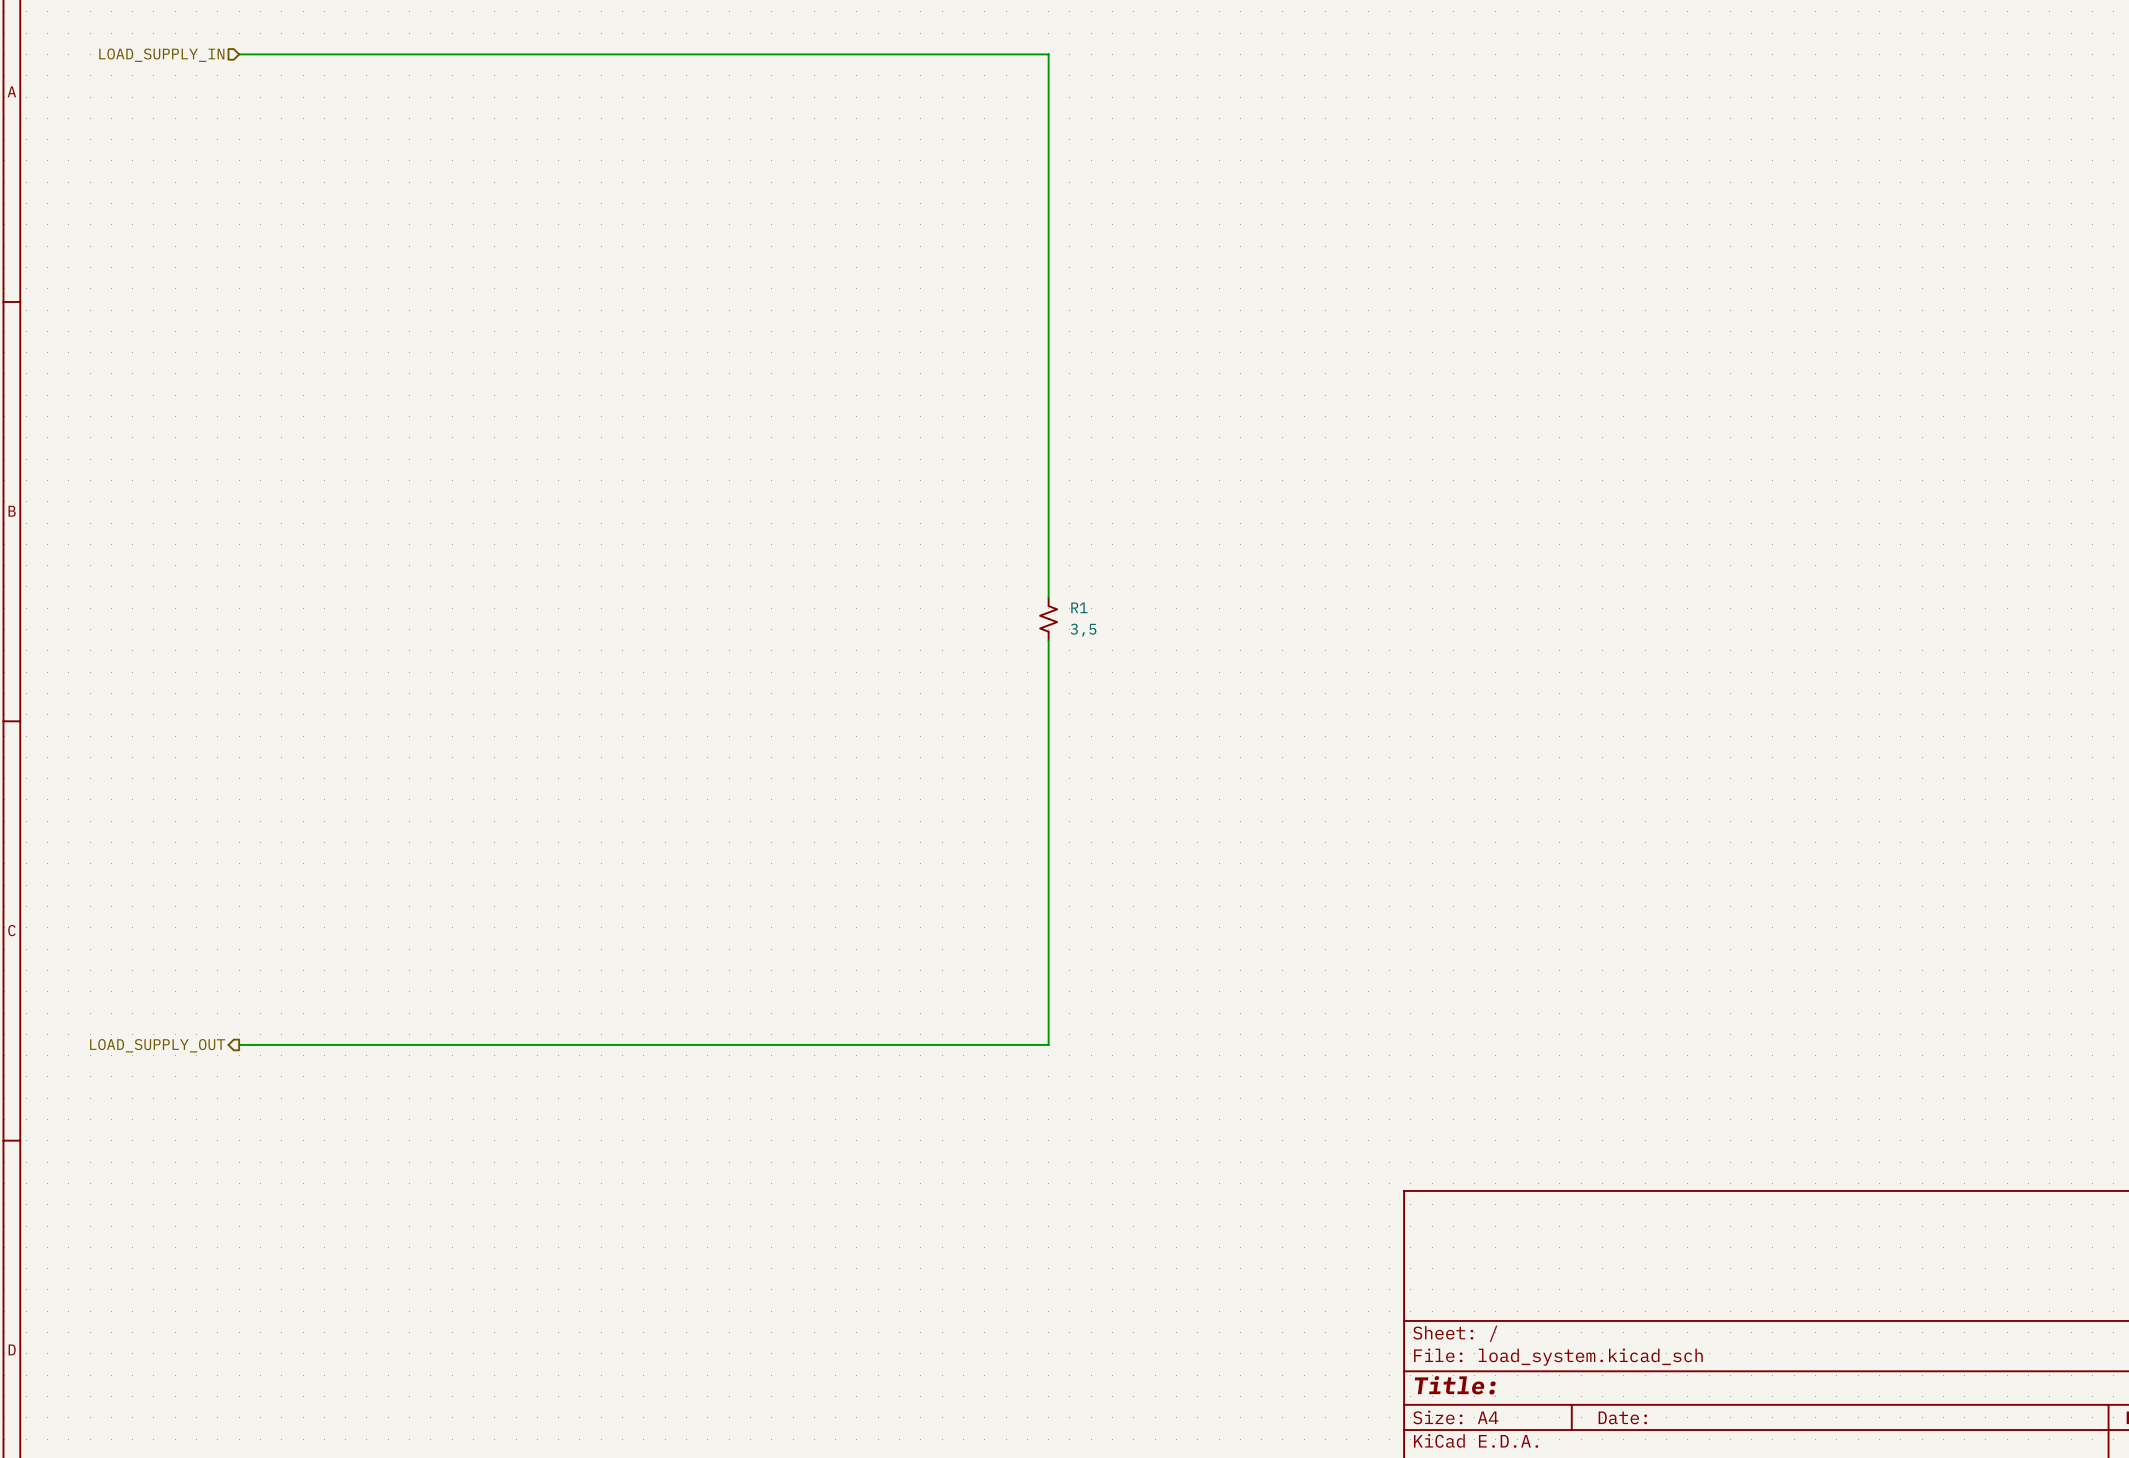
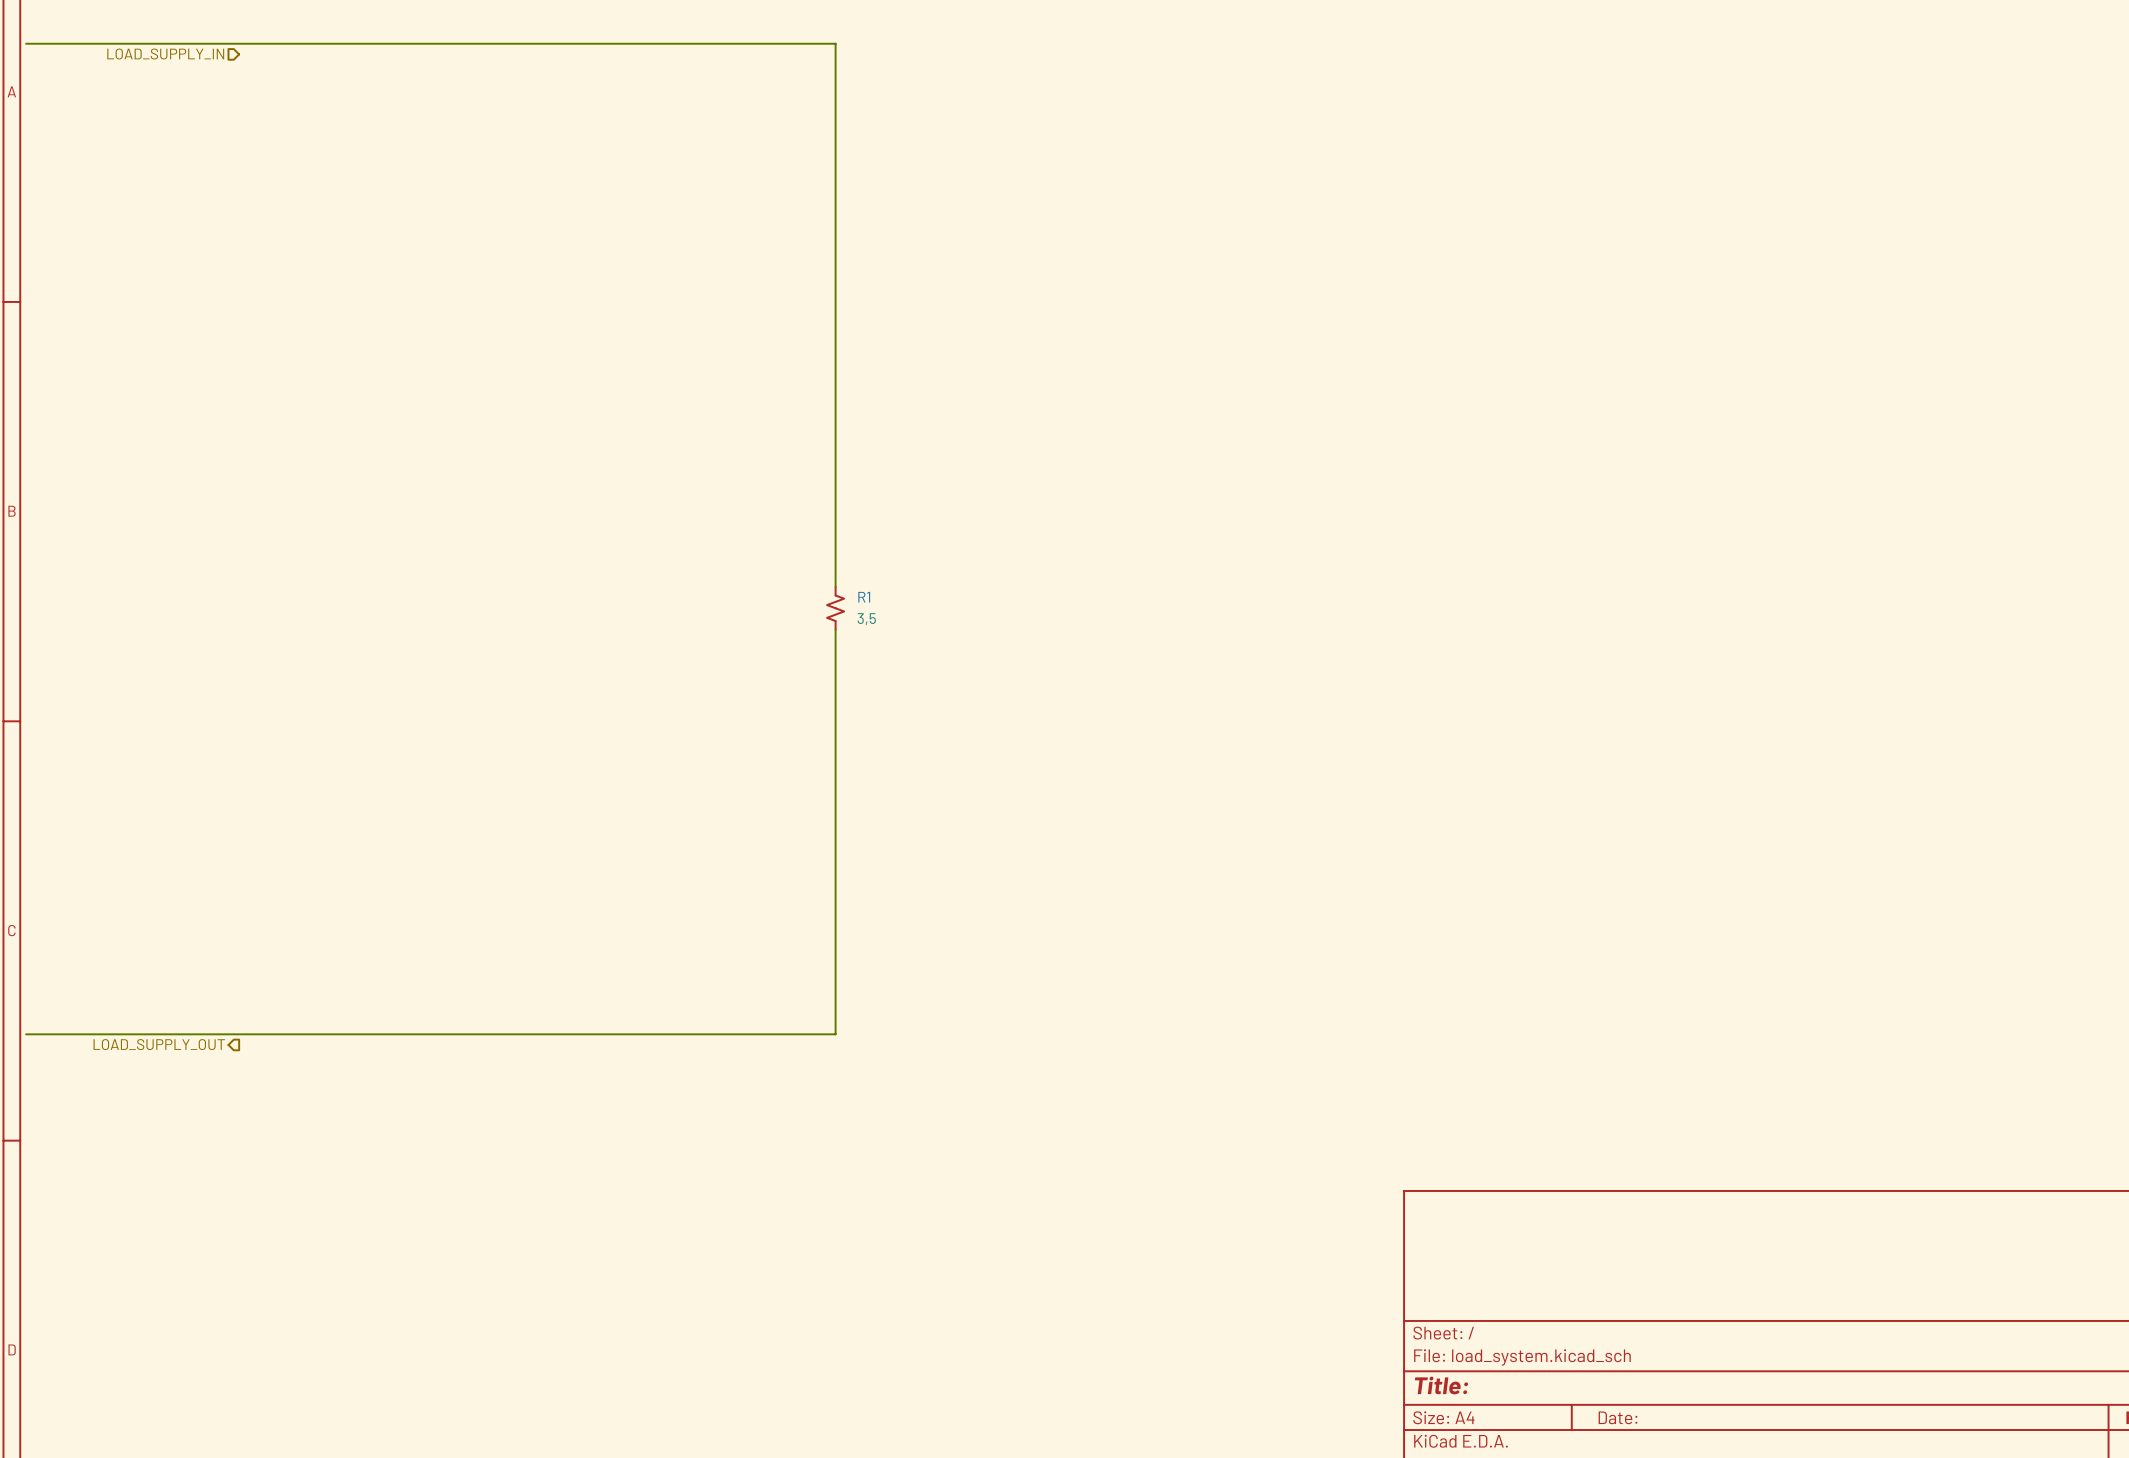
wire: none -> (26, 43) (835, 43) (835, 586)
wire: (239, 54) (1048, 54) (1048, 597) -> none
R1 position: (1048, 618) -> (835, 608)
wire: none -> (835, 629) (835, 1034) (26, 1034)
wire: (1048, 640) (1048, 1044) (239, 1044) -> none

